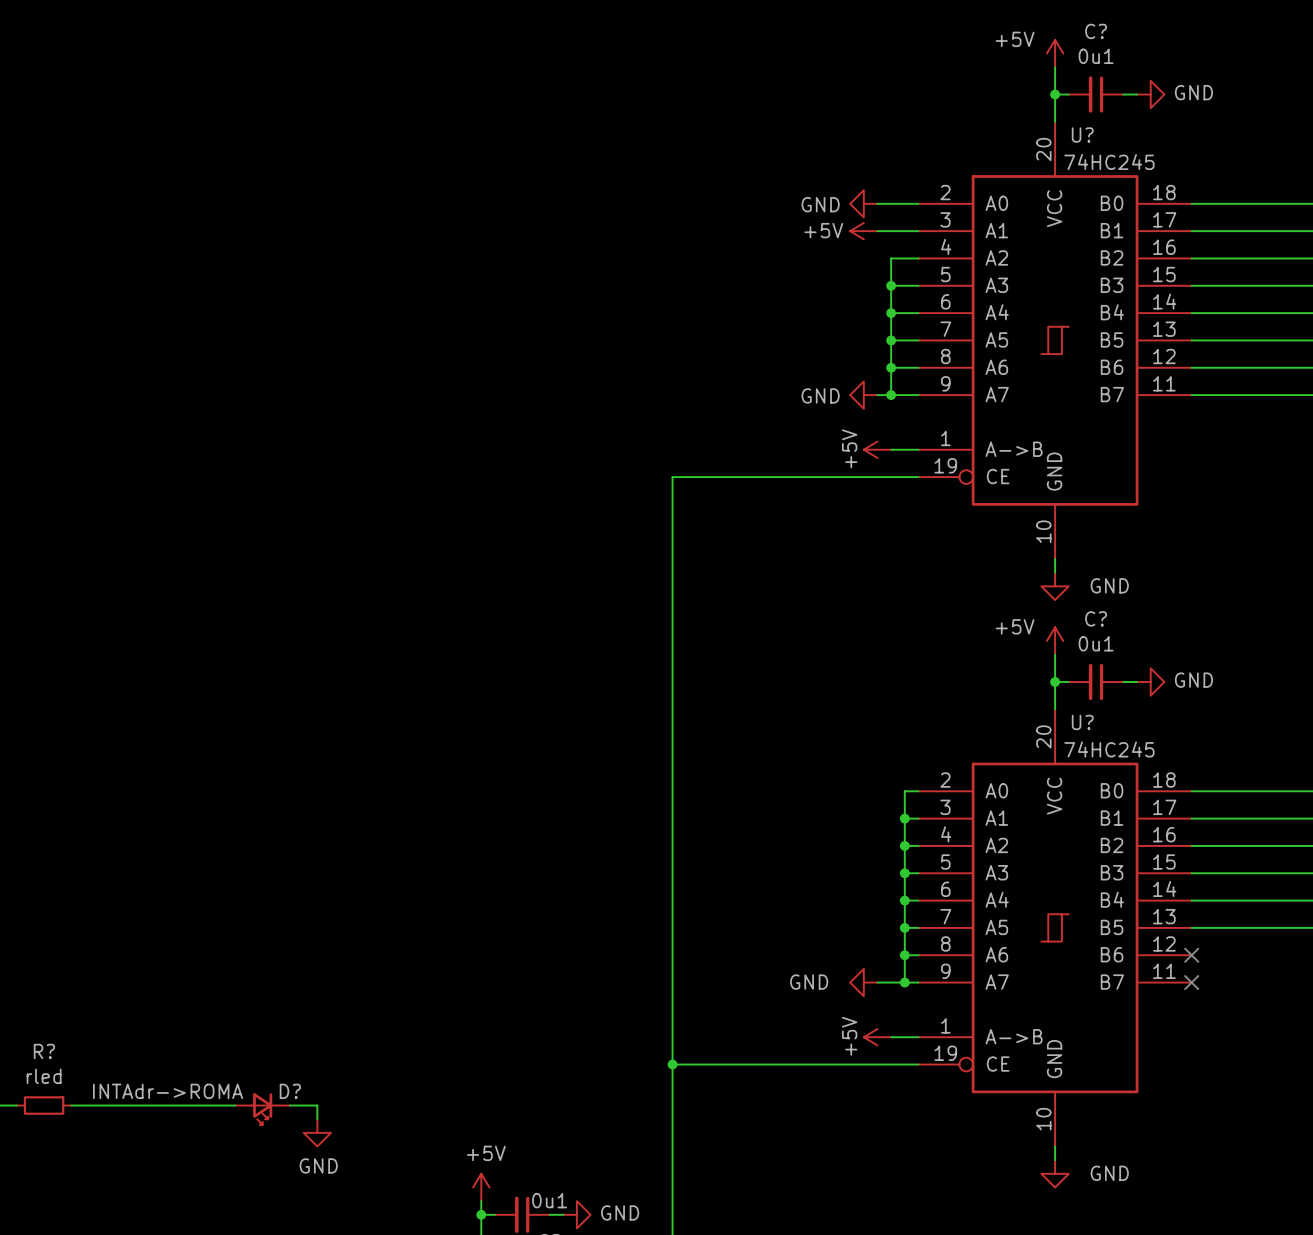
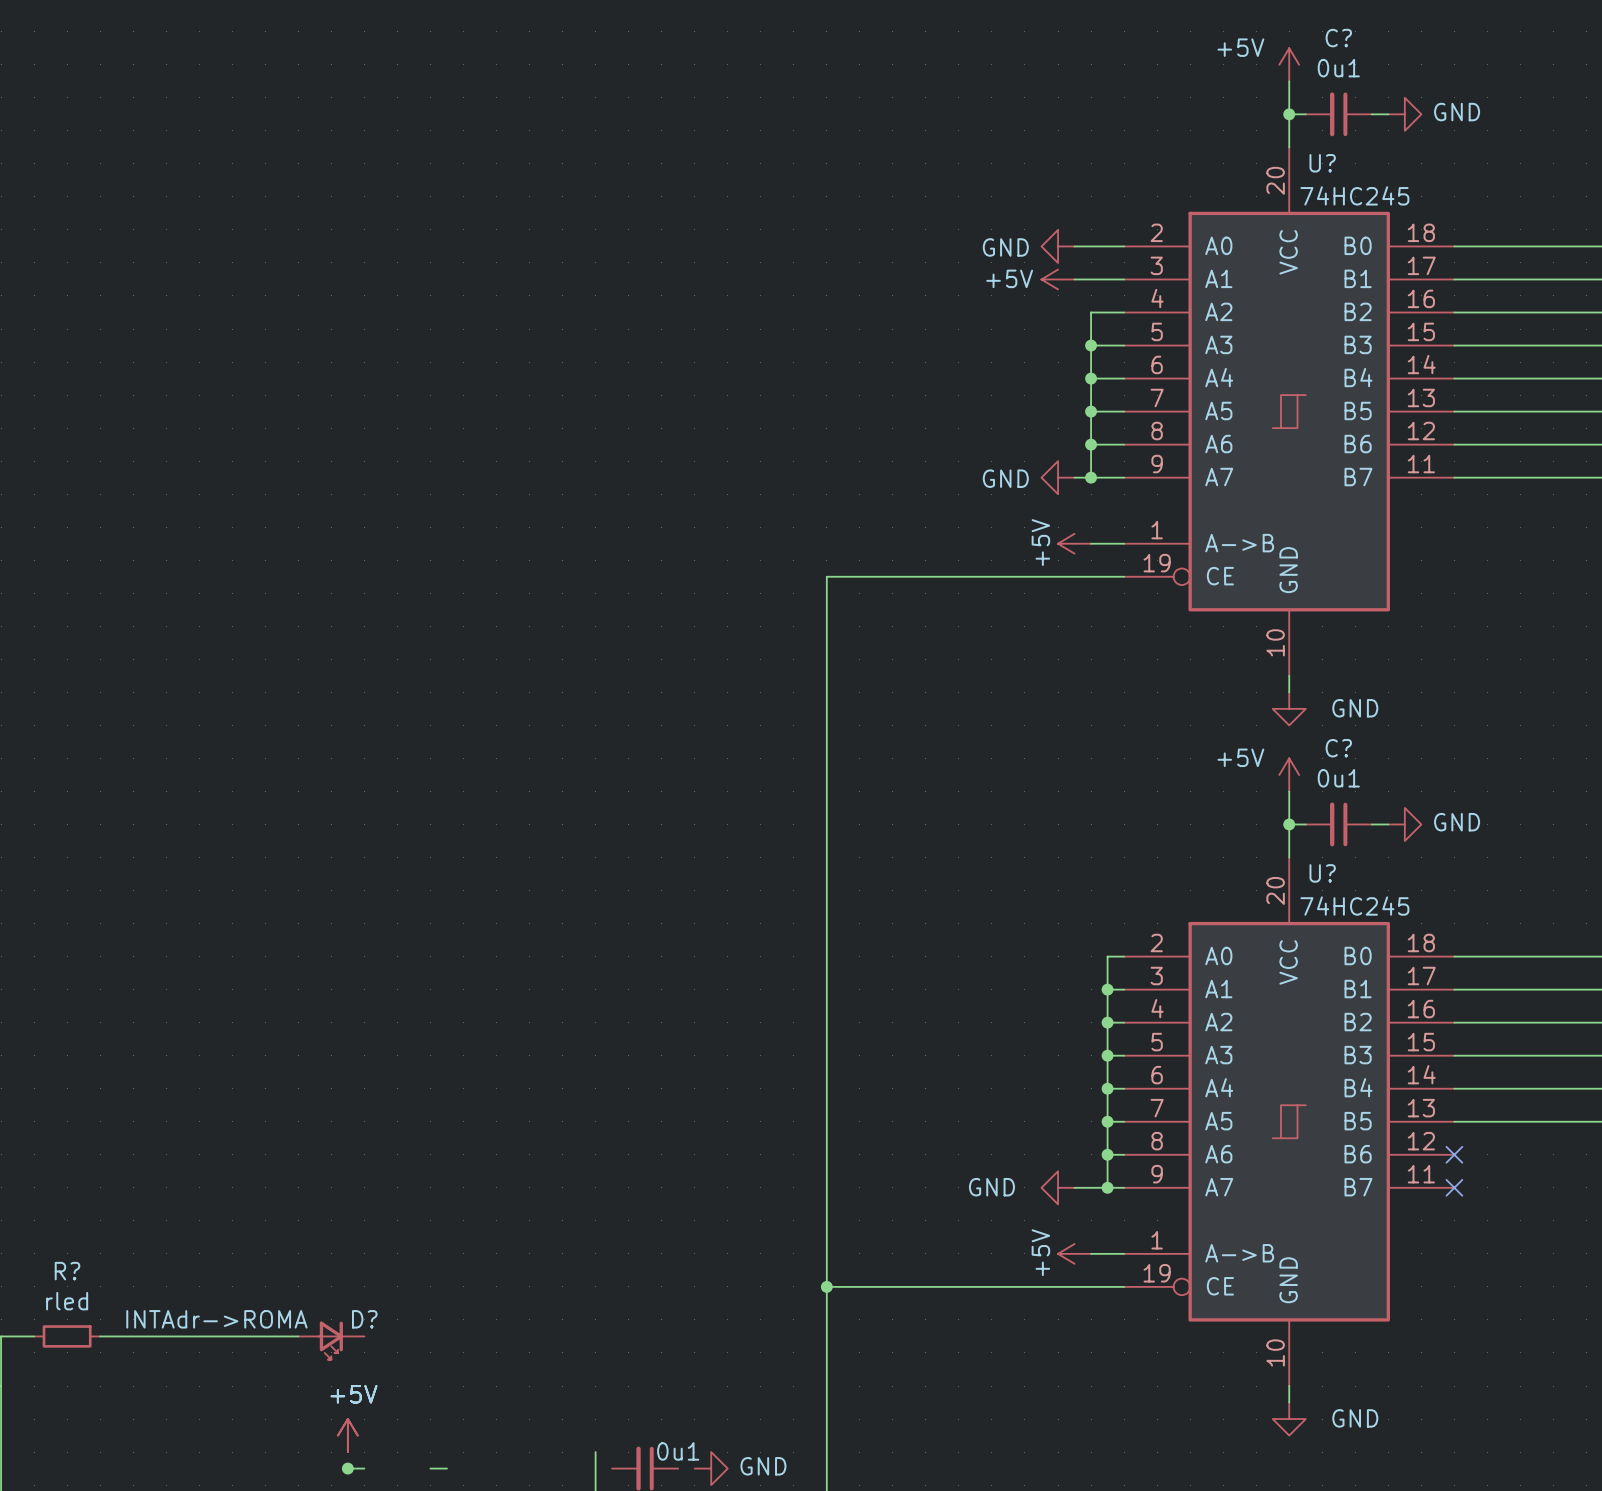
wire: (290, 1105) (317, 1105) (317, 1119) -> none
power symbol: GND (317, 1132) -> none
power symbol position: +5V (481, 1187) -> +5V (347, 1435)
junction: none -> (347, 1468)
wire: (481, 1214) (494, 1214) -> (347, 1468) (364, 1468)
junction: (481, 1214) -> none
wire: (549, 1214) (563, 1214) -> (430, 1468) (446, 1468)

